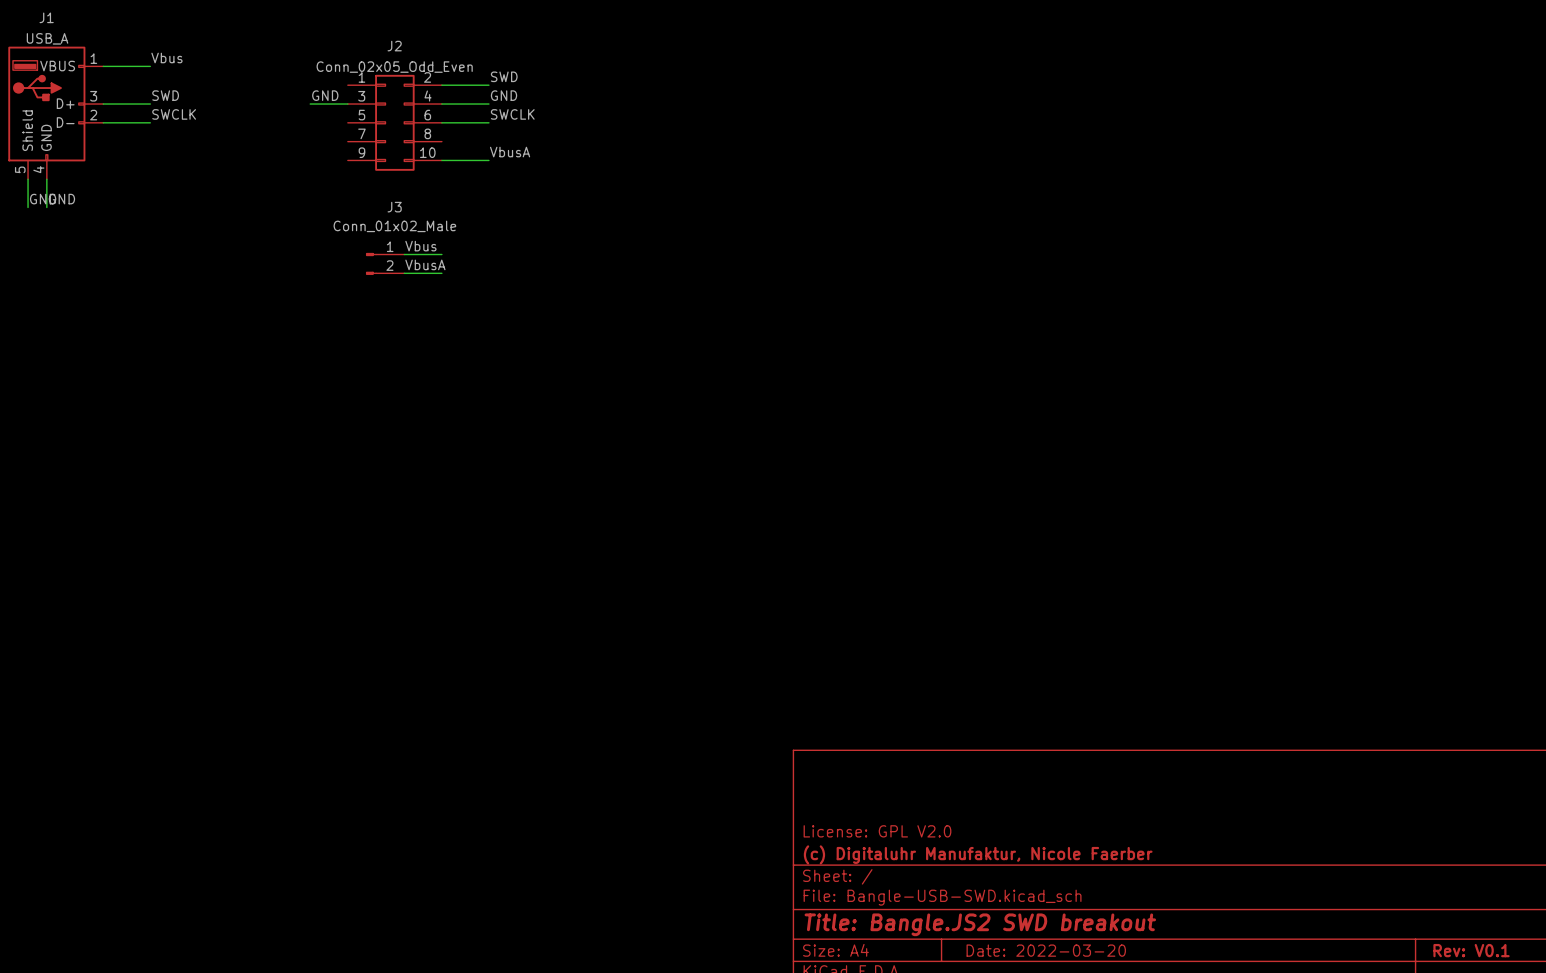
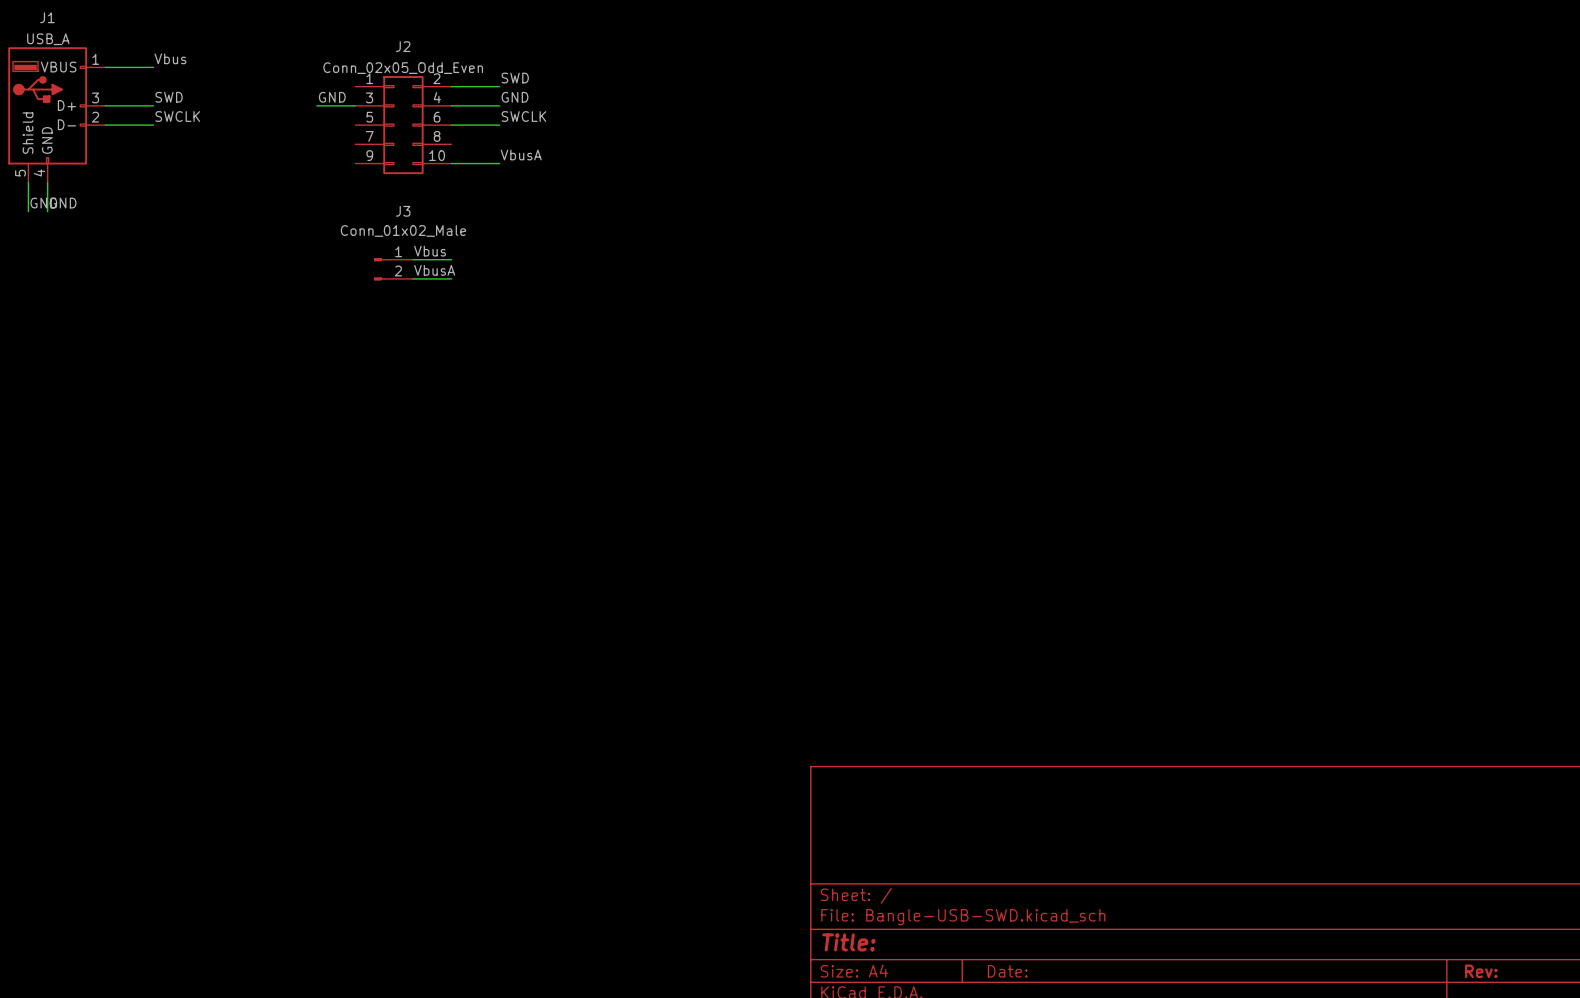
title block: License: GPL V2.0 (877, 831) -> none
title block: (c) Digitaluhr Manufaktur, Nicole Faerber (978, 854) -> none
title block: Title: Bangle.JS2 SWD breakout (980, 924) -> Title: (848, 942)
title block: Date: 2022-03-20 (1046, 950) -> Date: (1007, 971)
title block: Rev: V0.1 (1471, 950) -> Rev: (1481, 971)

